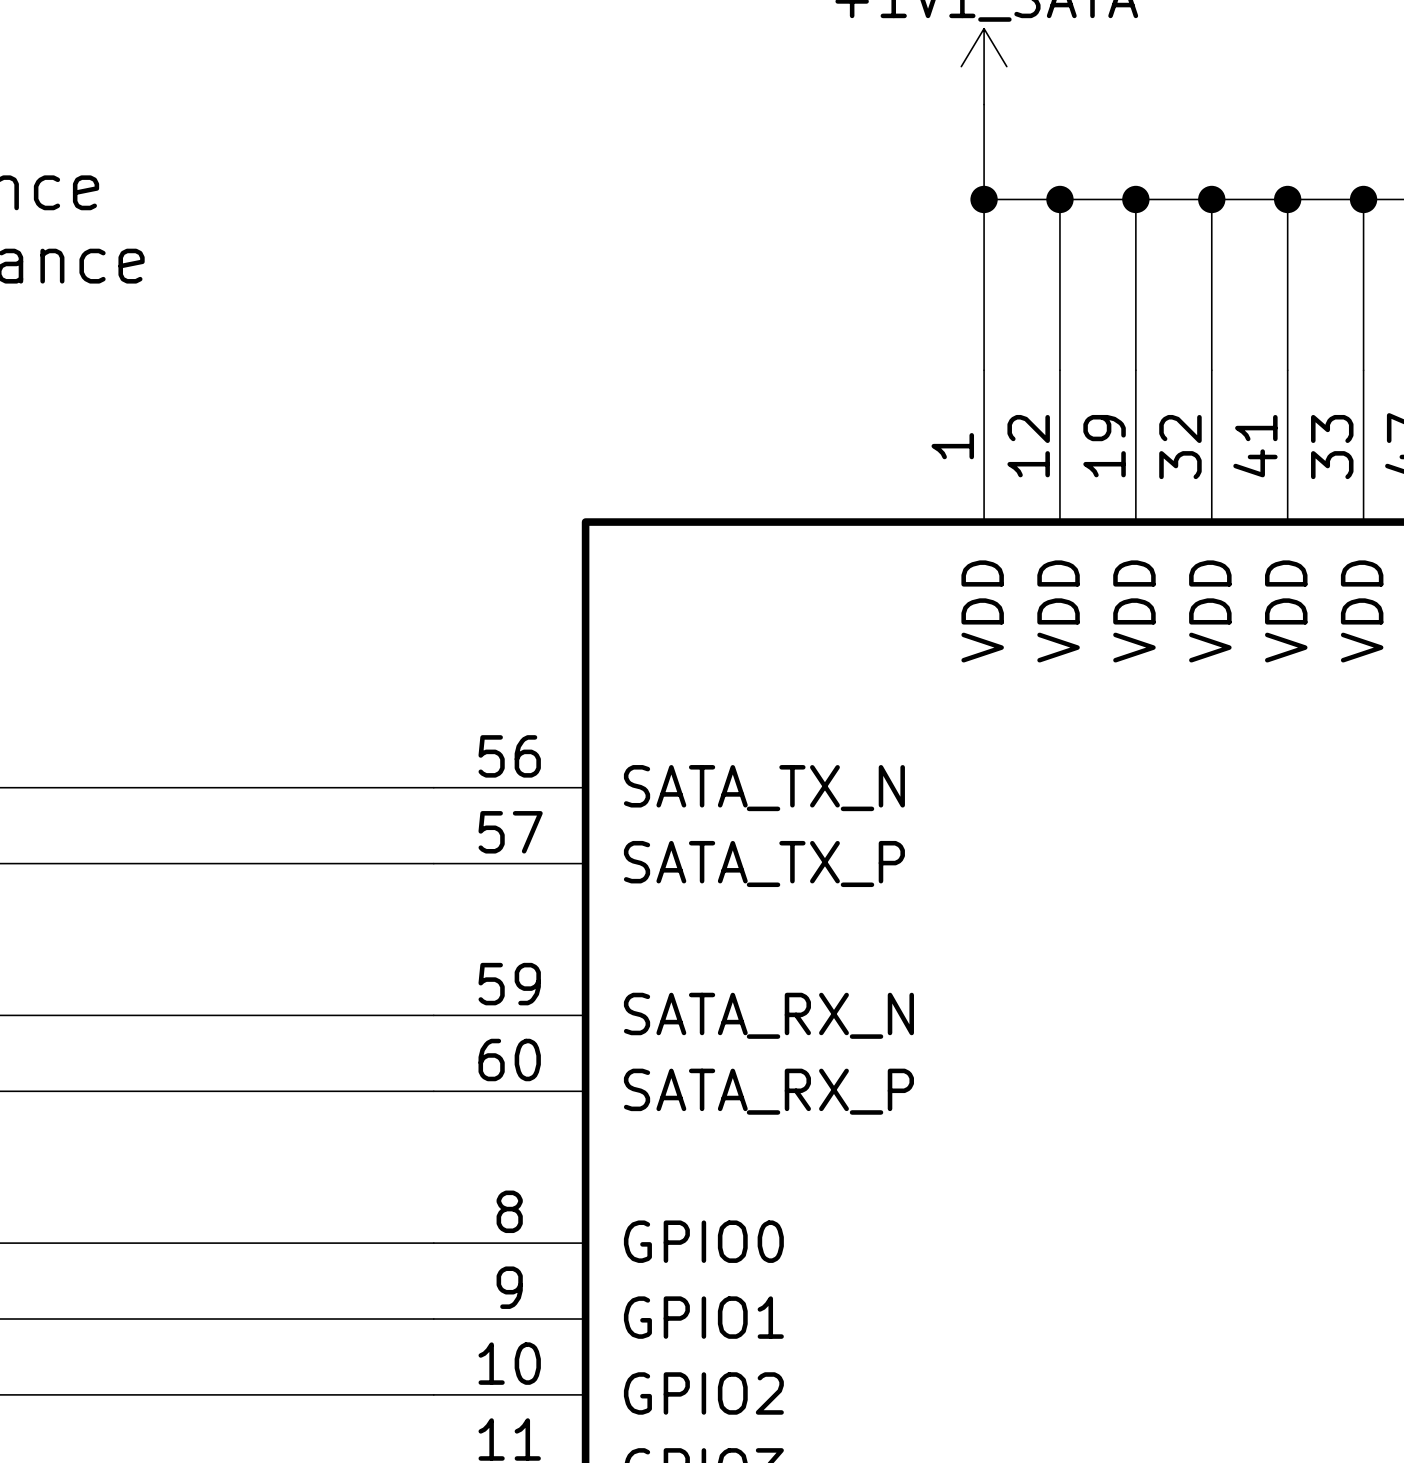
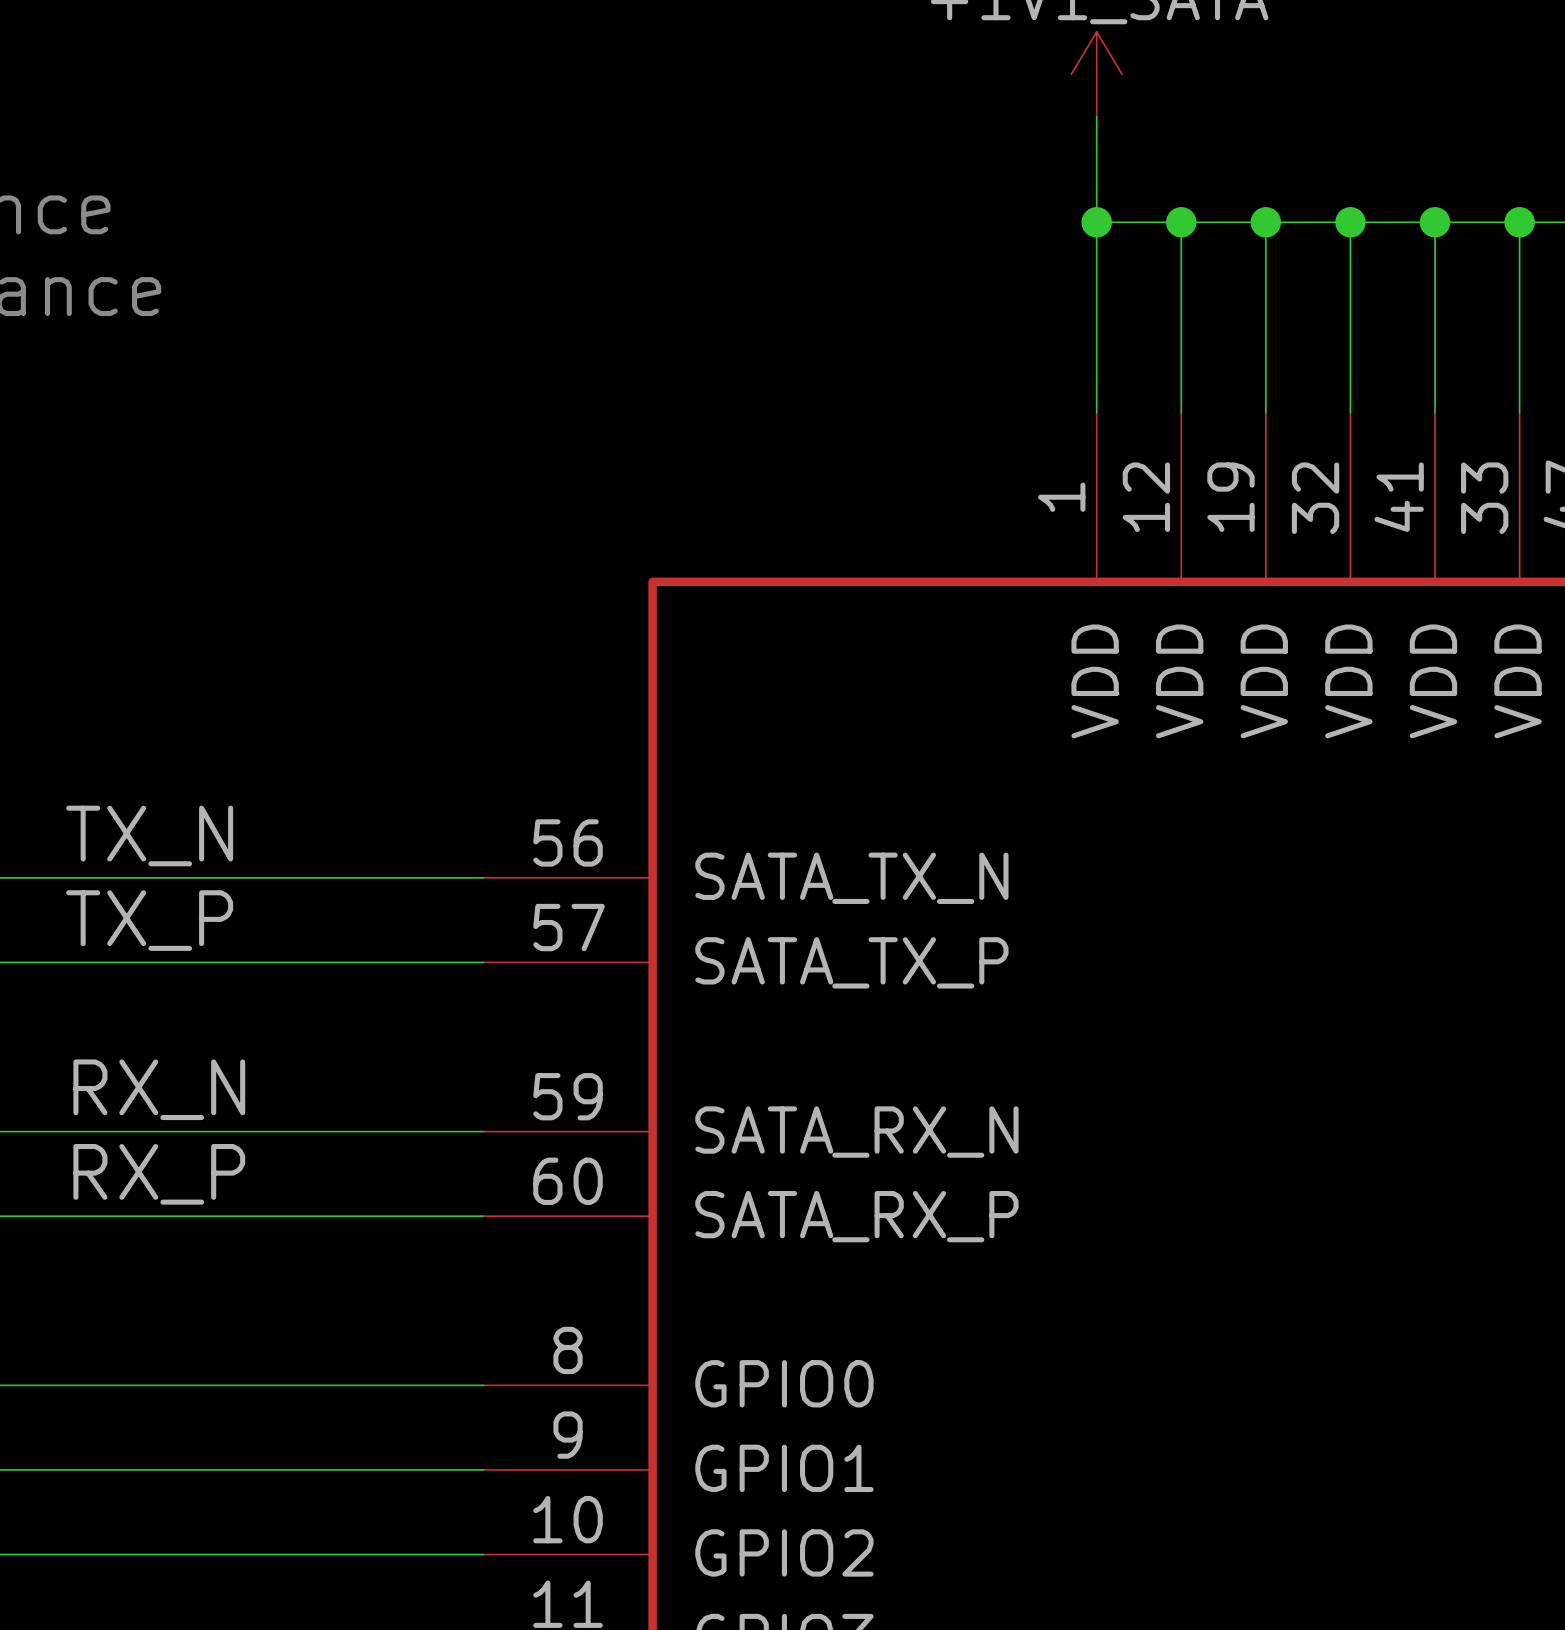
label: none -> TX_N (149, 835)
label: none -> TX_P (149, 920)
label: none -> RX_N (159, 1089)
label: none -> RX_P (159, 1174)

